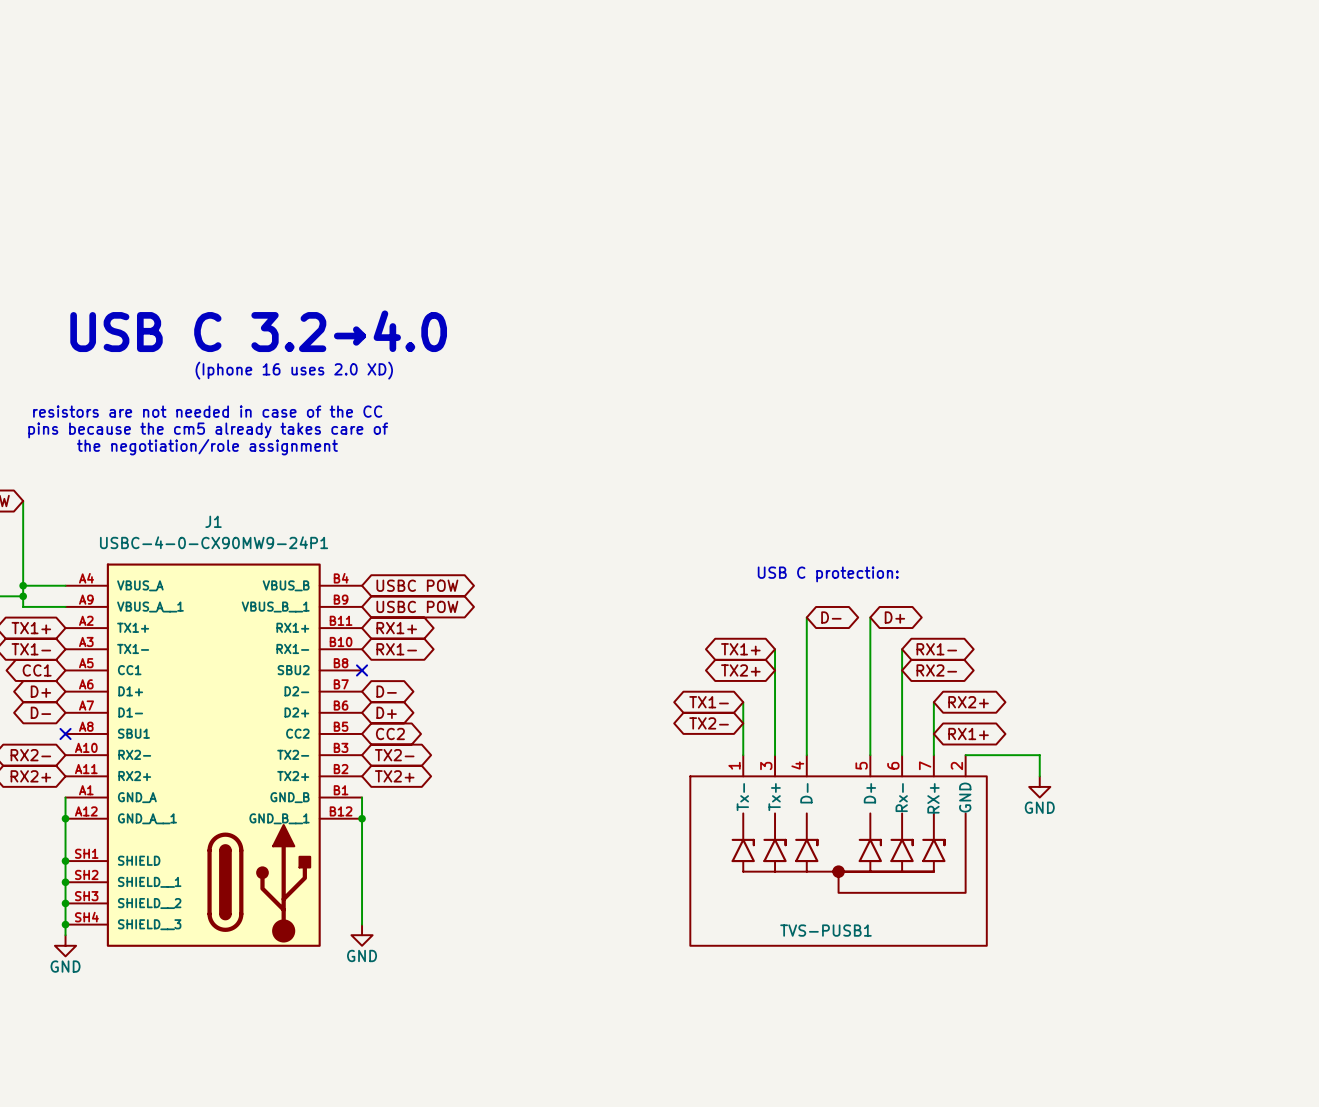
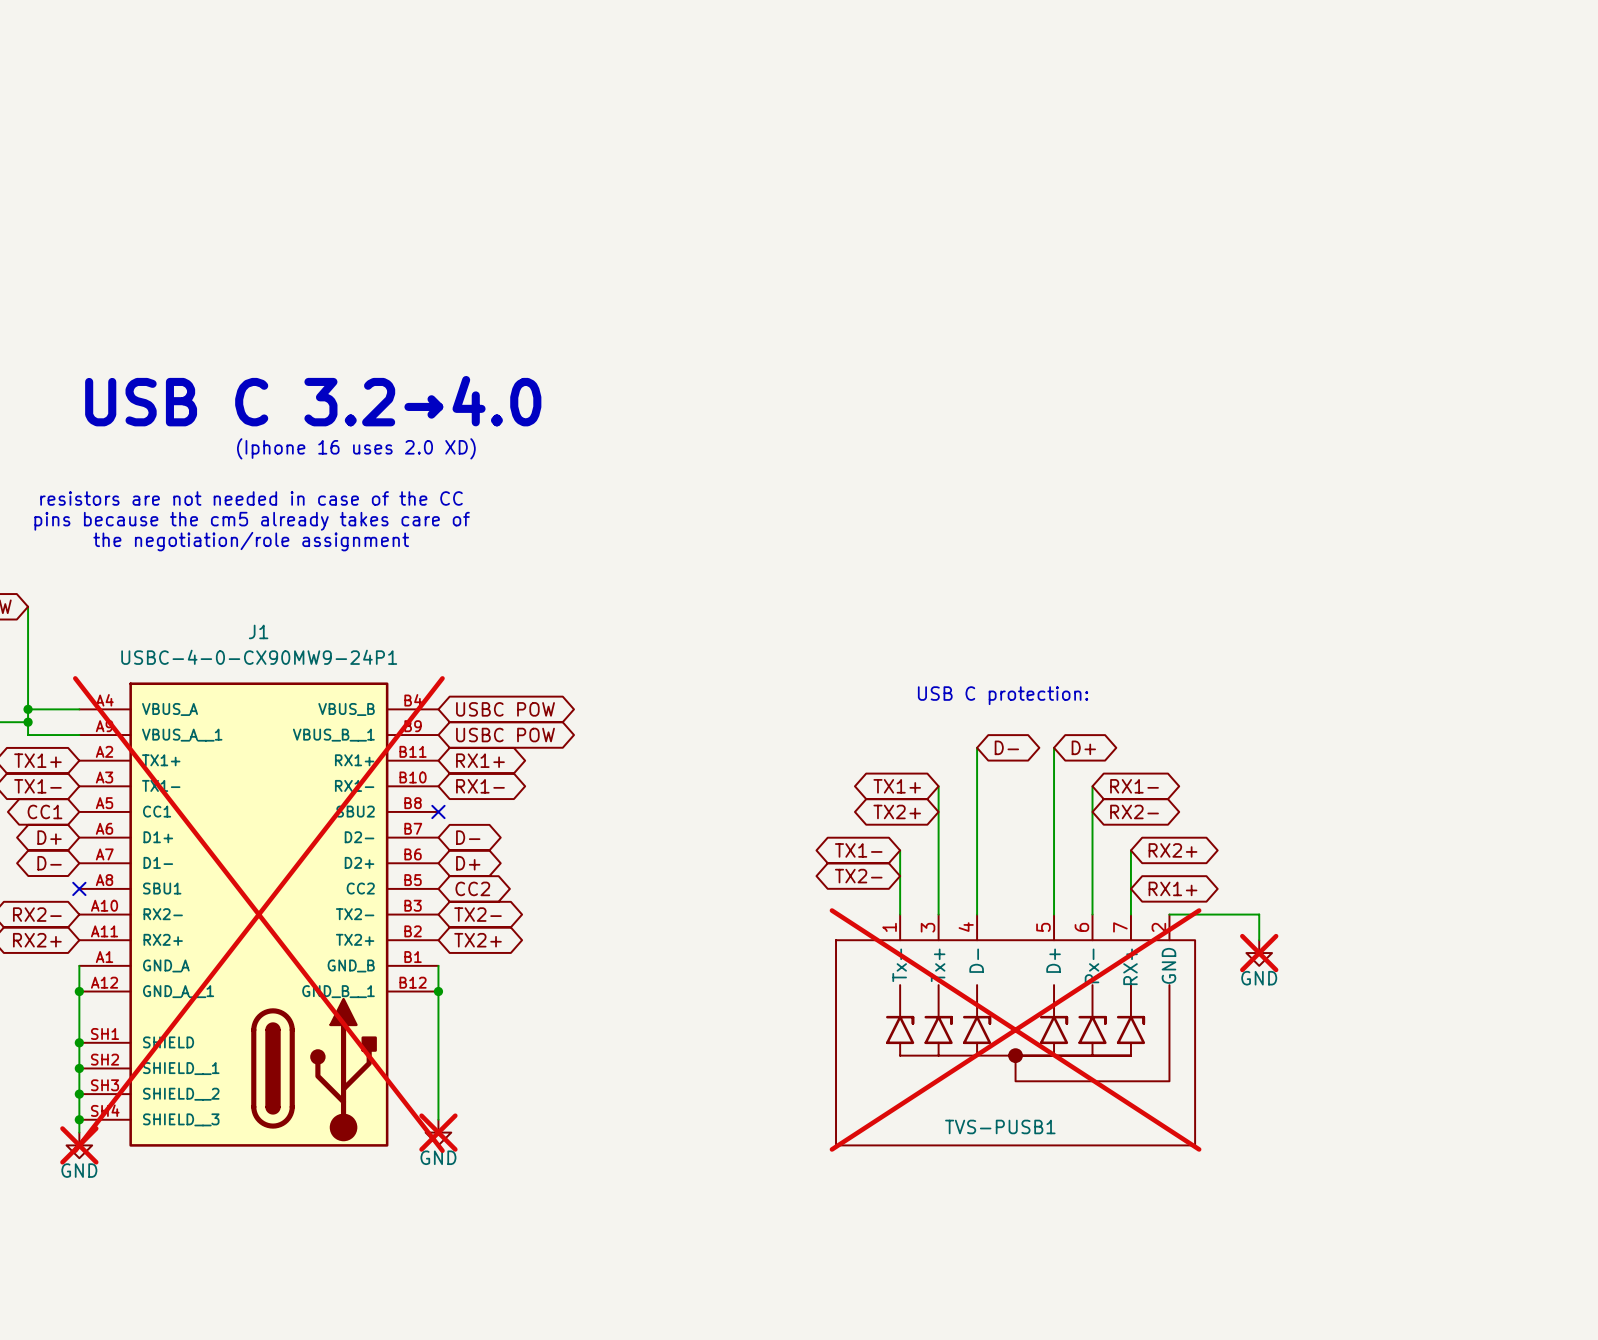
J1 do-not-place cross: none -> (258, 914)
power symbol do-not-place cross: none -> (1259, 953)
TVS-PUSB1 do-not-place cross: none -> (1015, 1029)
power symbol do-not-place cross: none -> (438, 1132)
power symbol do-not-place cross: none -> (79, 1145)

